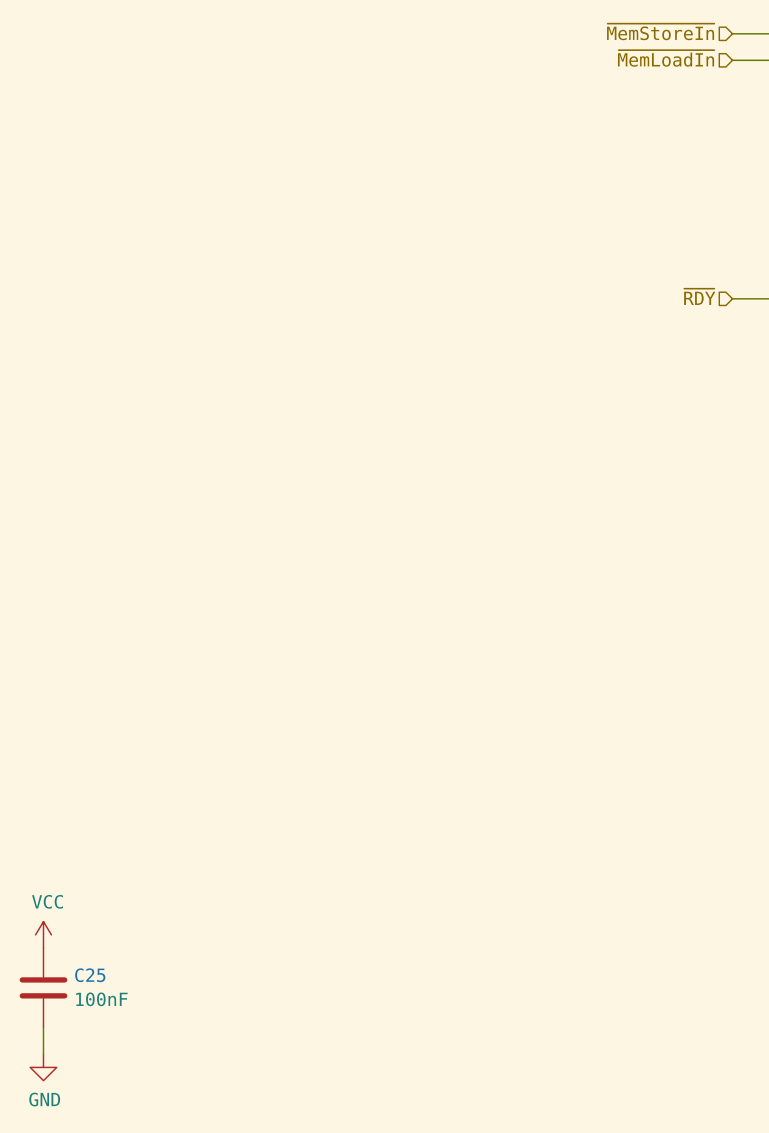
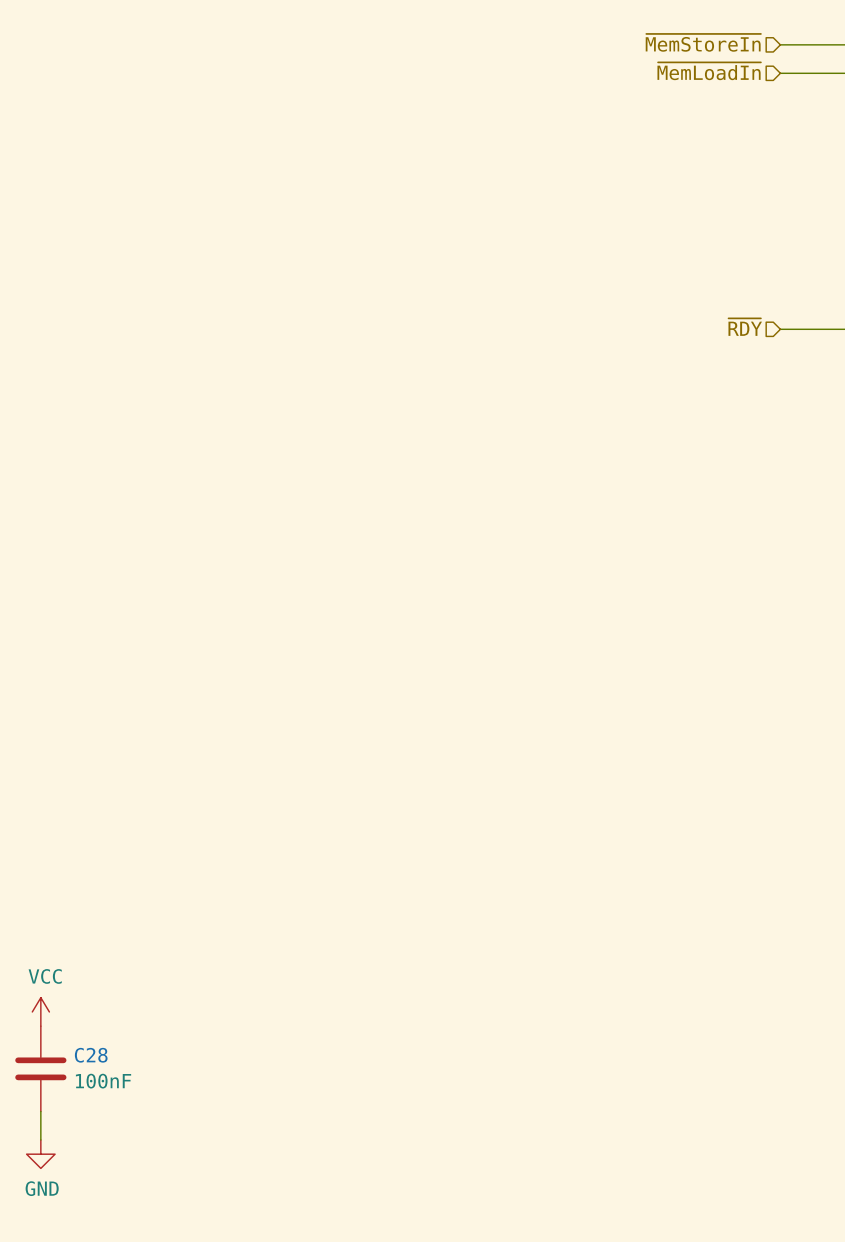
C25 name: C25 (90, 975) -> C28 (91, 1055)

